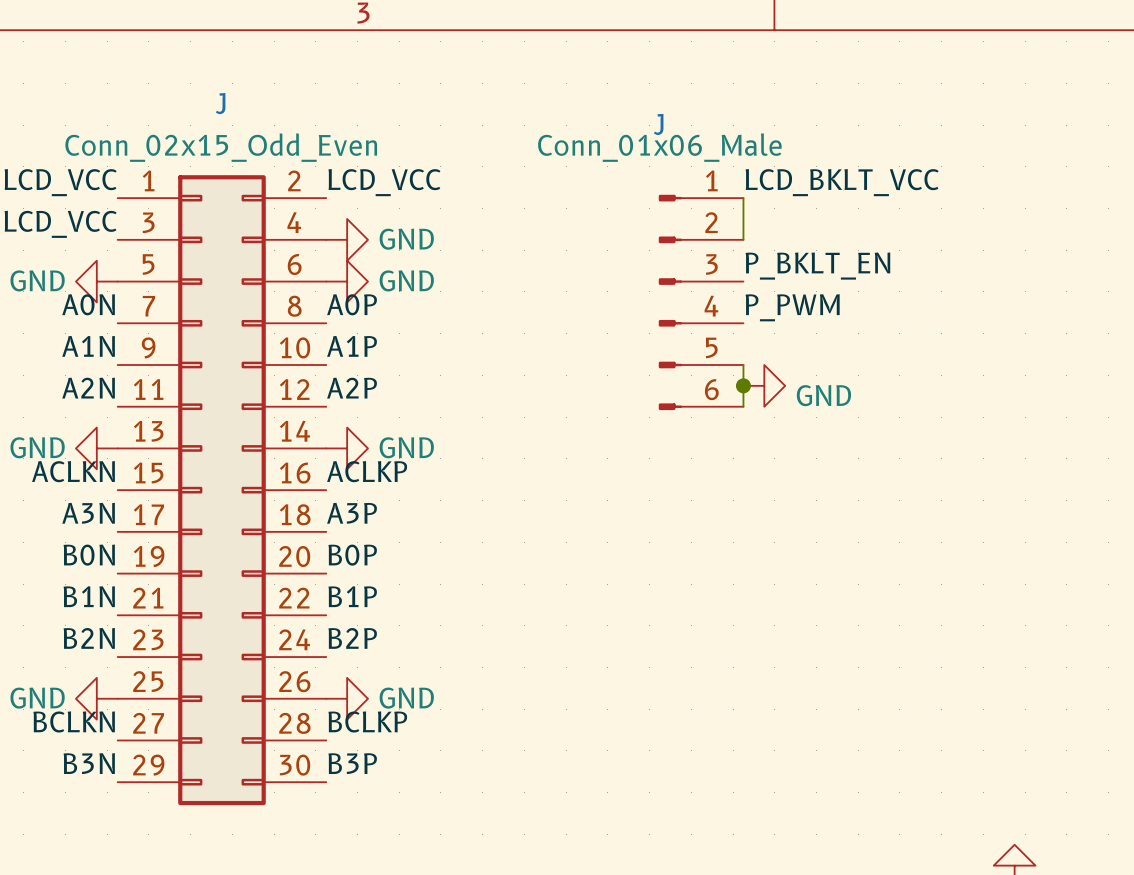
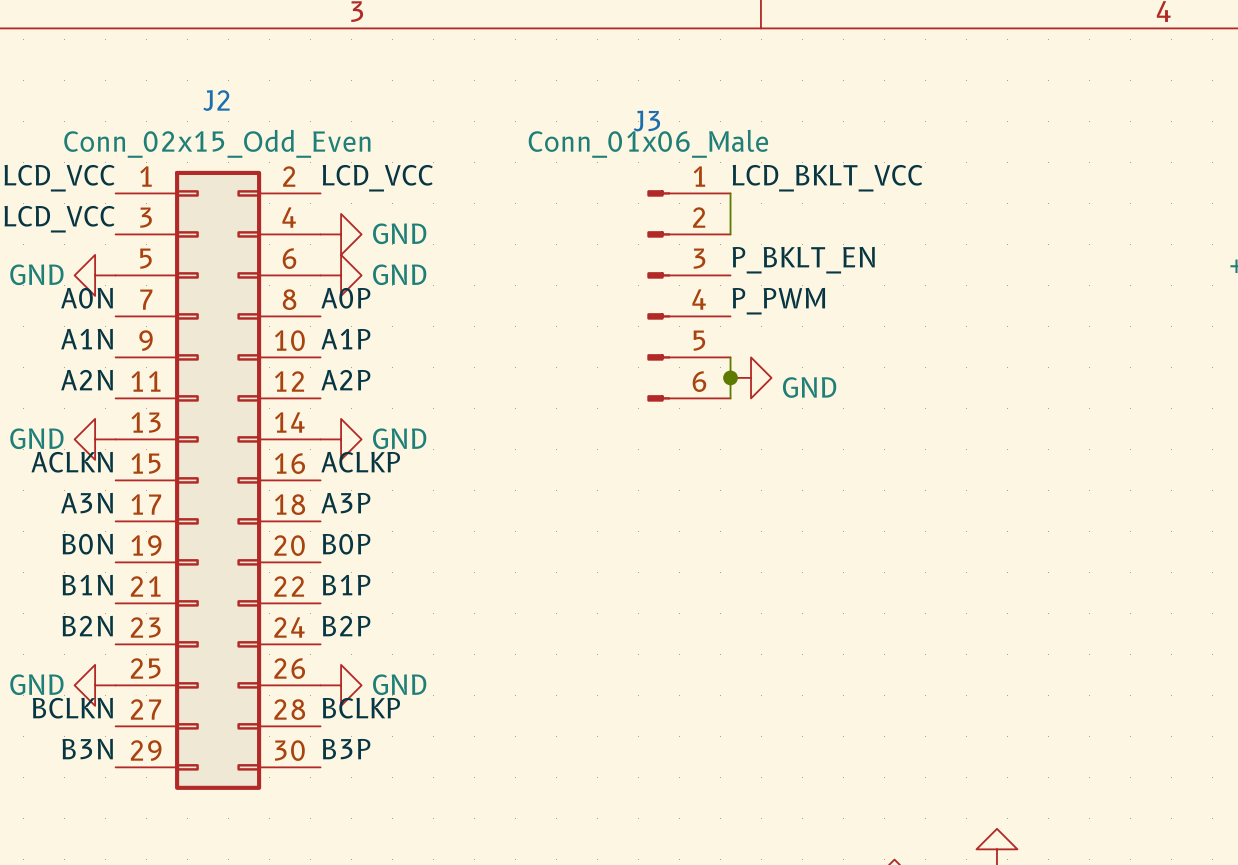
J name: J (220, 103) -> J2 (216, 100)
J name: J (658, 124) -> J3 (646, 121)

